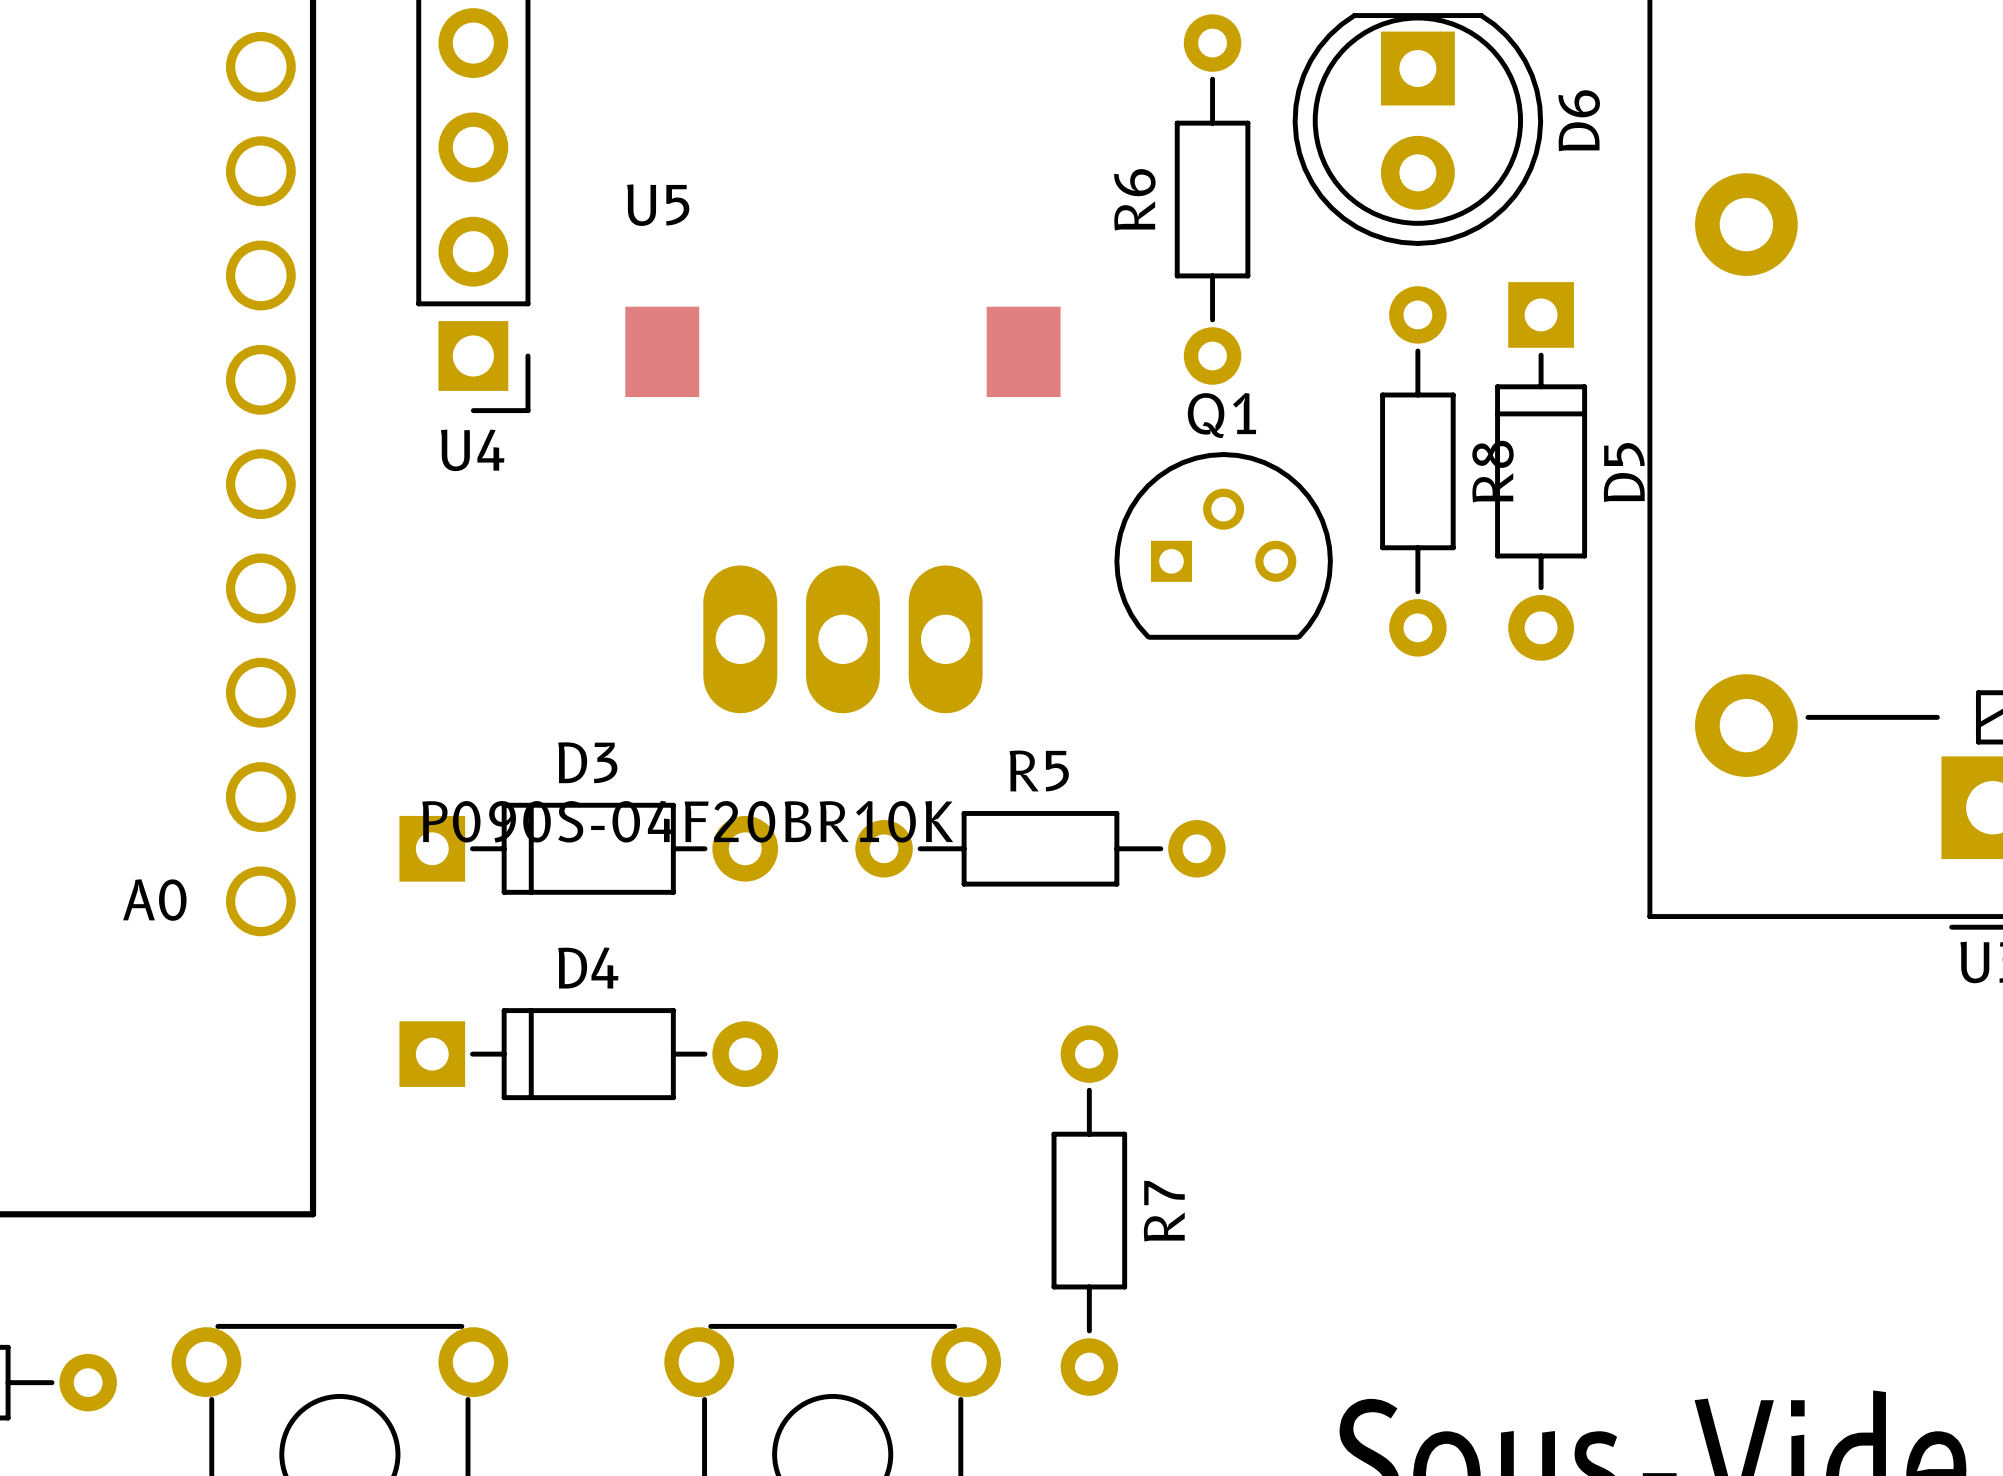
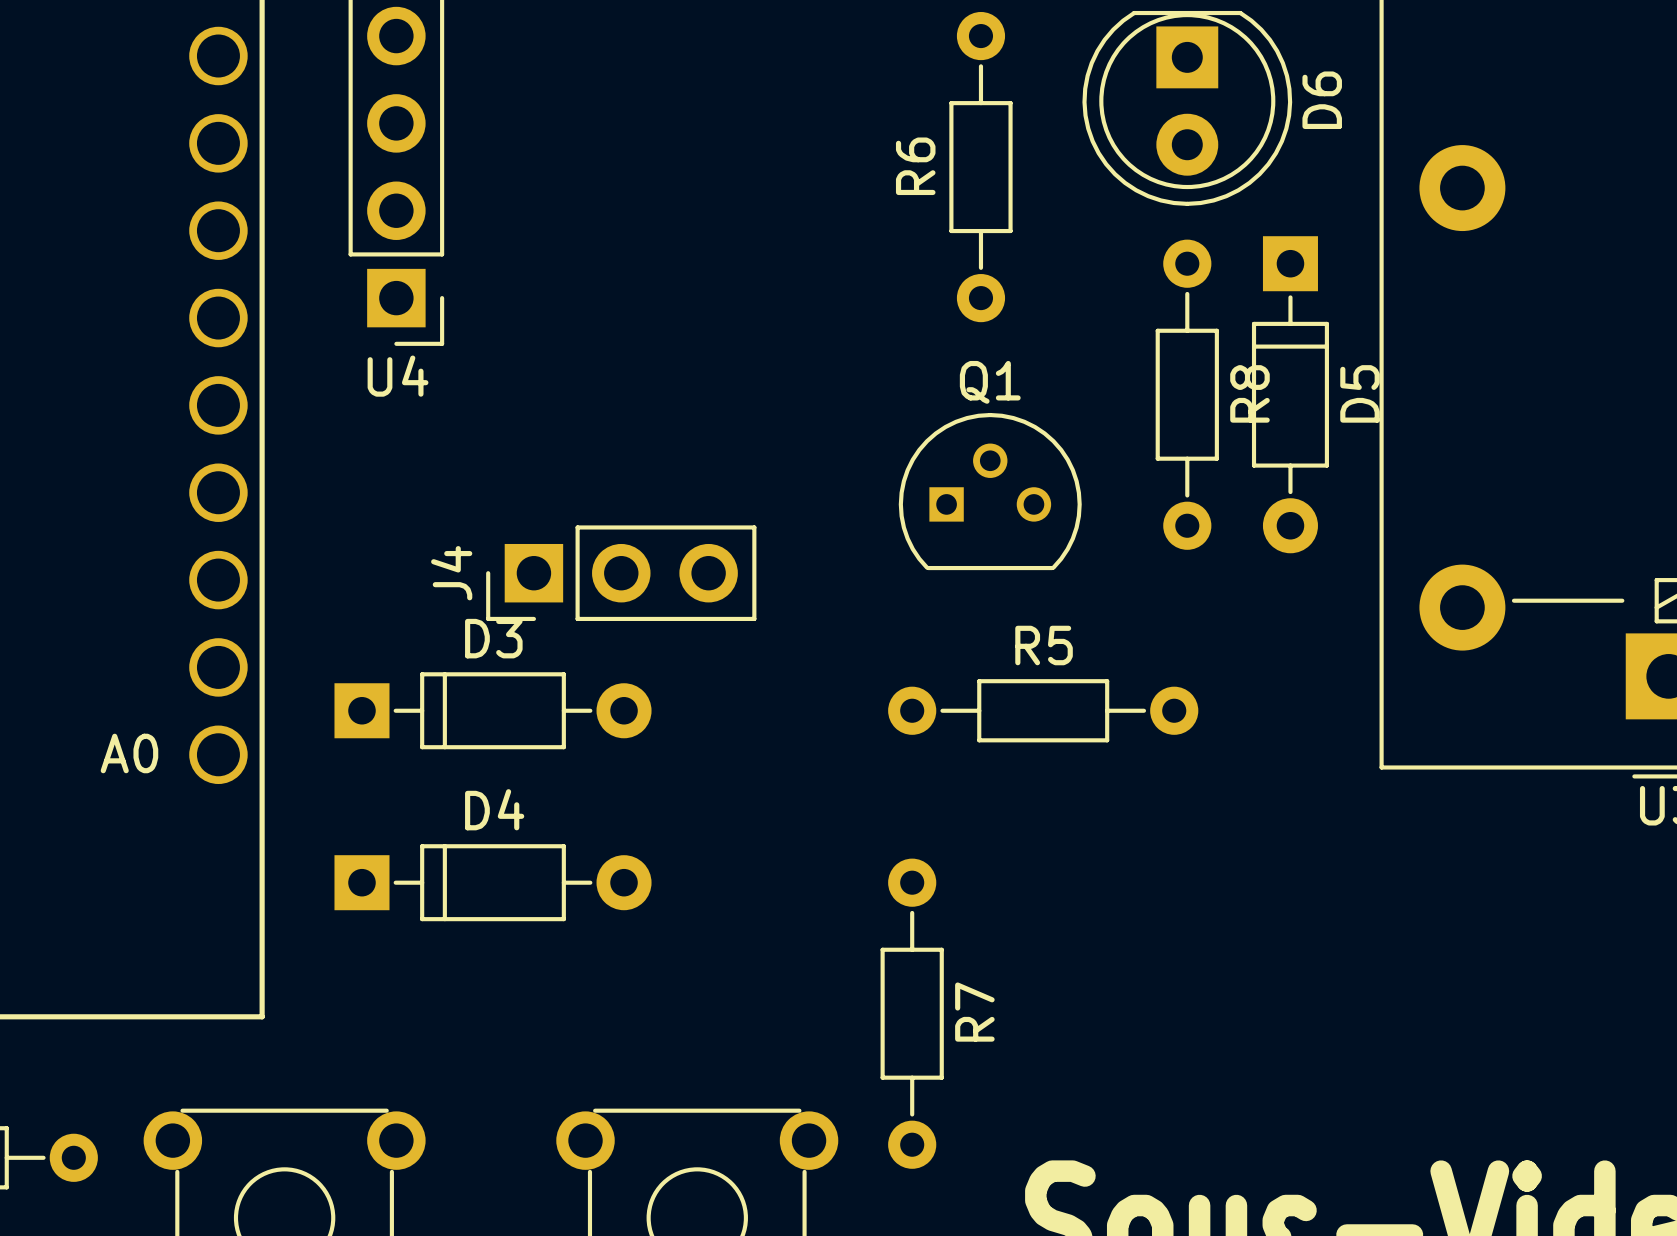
R6 position: (1212, 199) -> (980, 167)
U5: P090S-04F20BR10K (842, 509) -> none
Q1 position: (1223, 545) -> (990, 491)
J4: none -> (621, 573)
R5 position: (1040, 848) -> (1043, 710)

